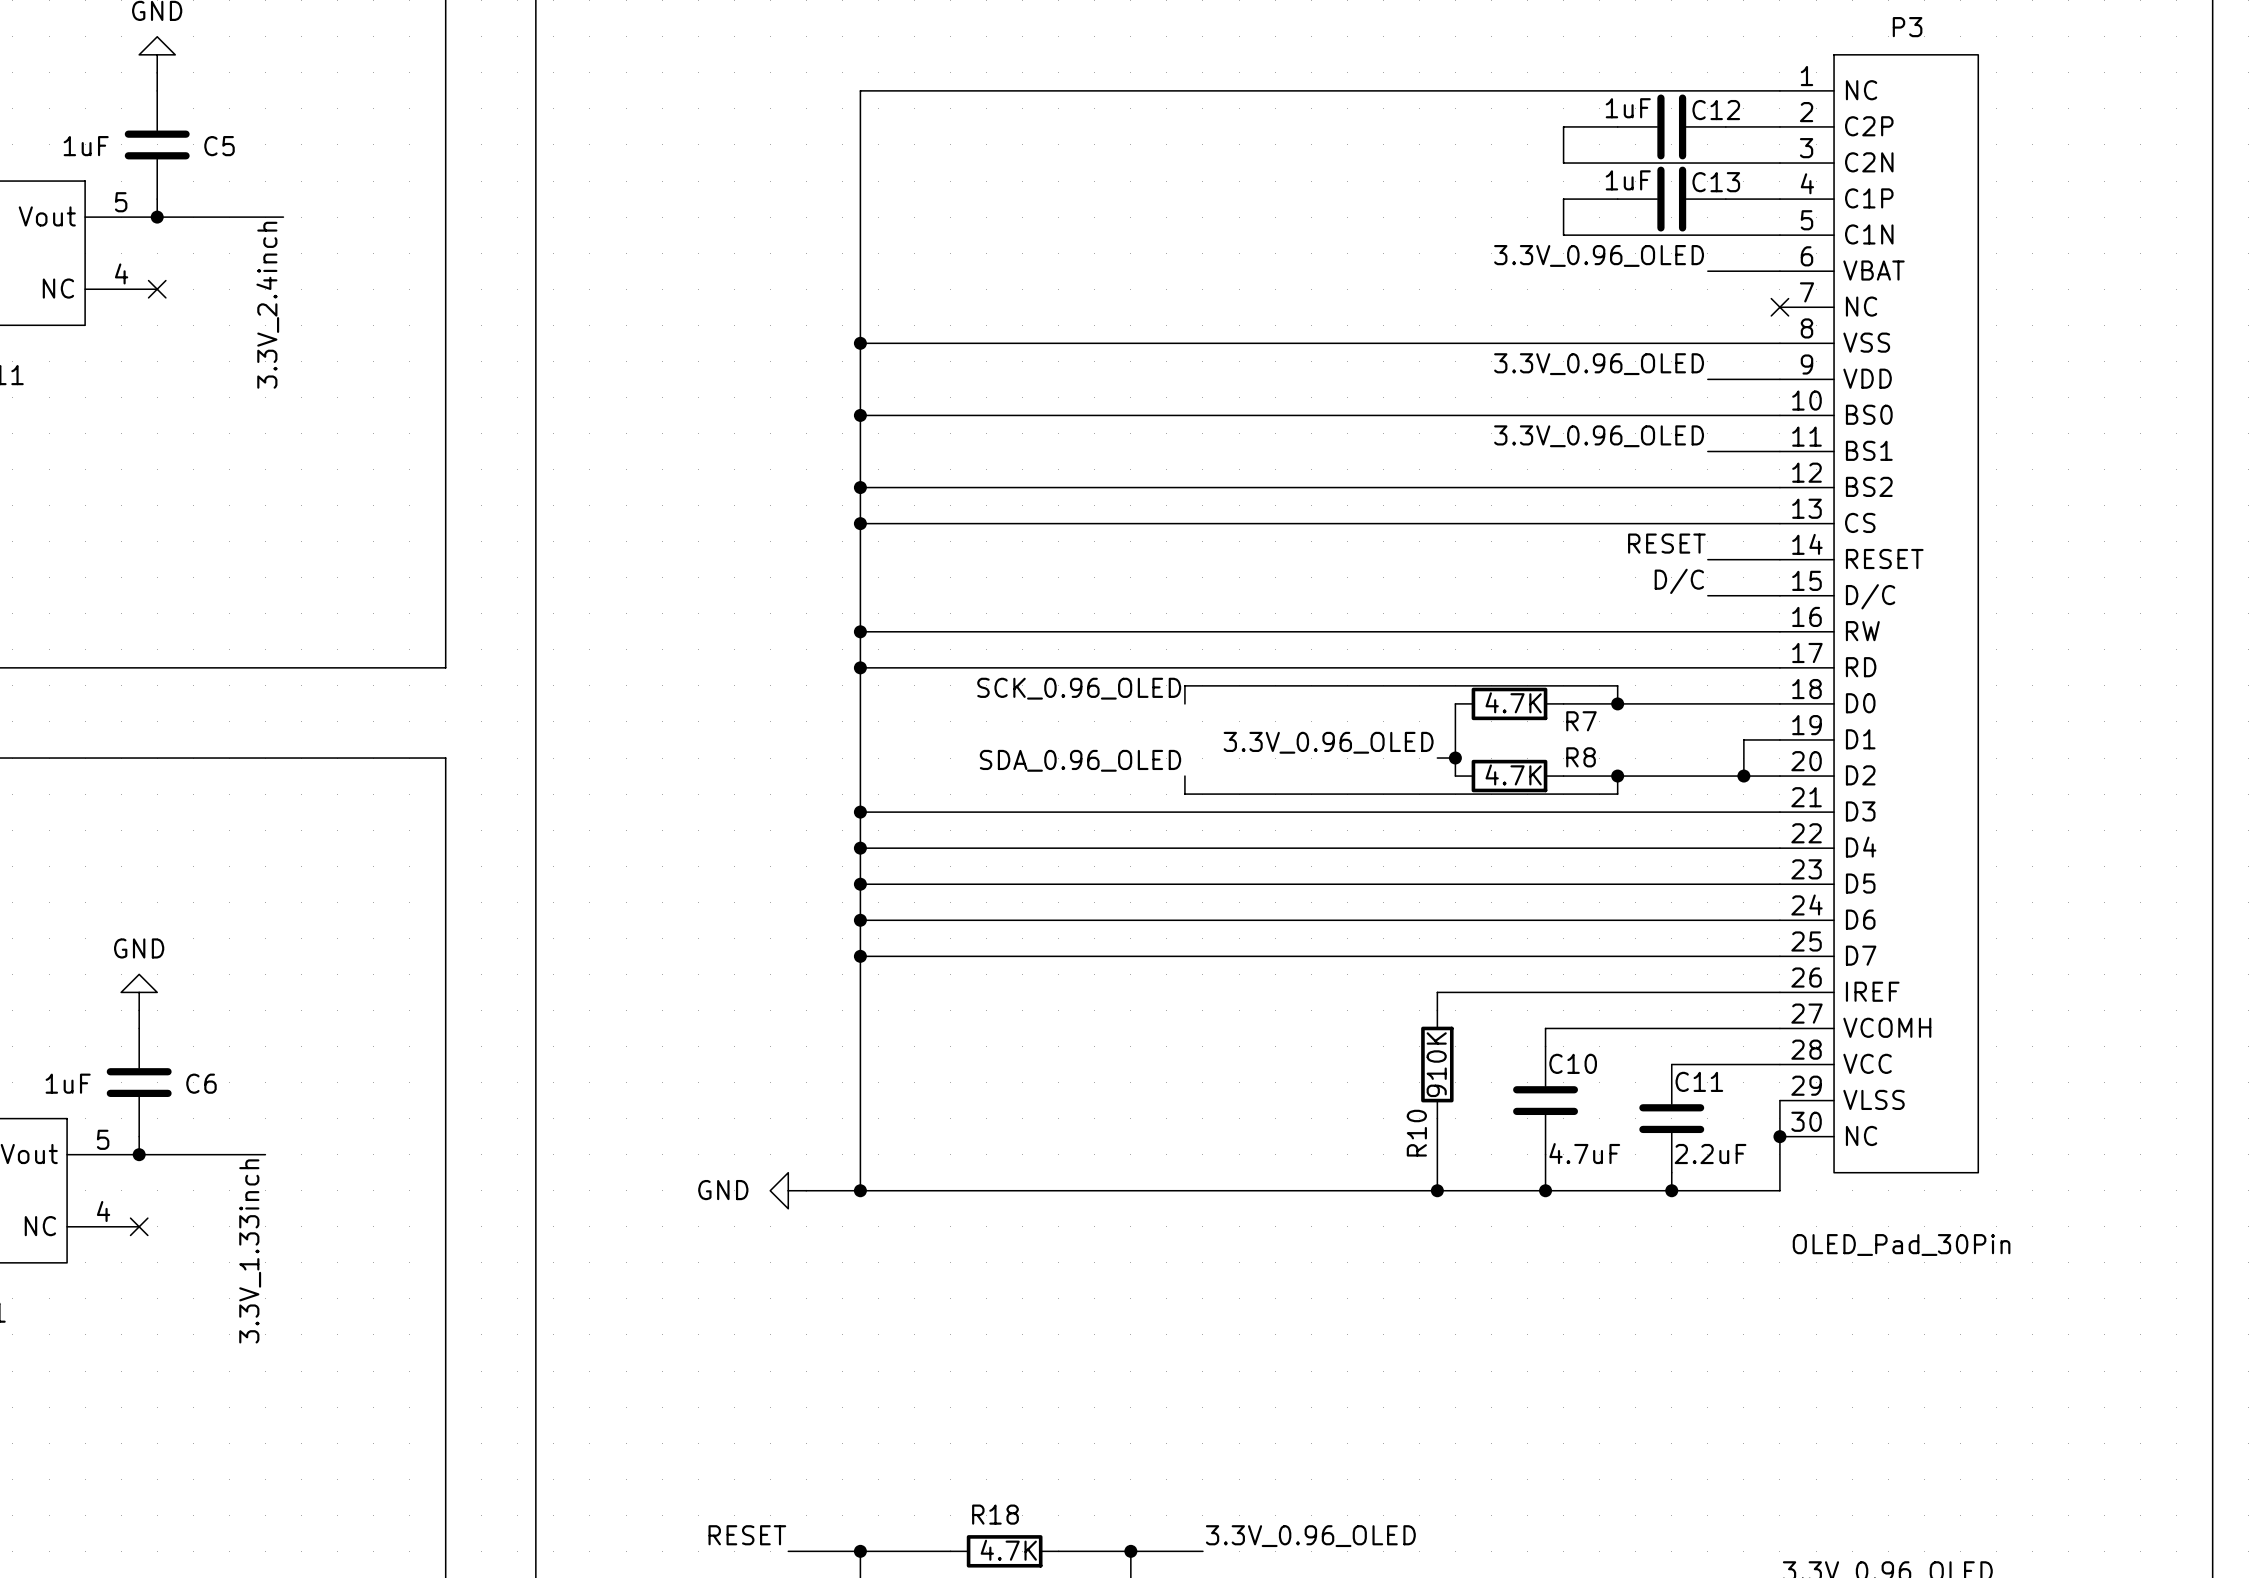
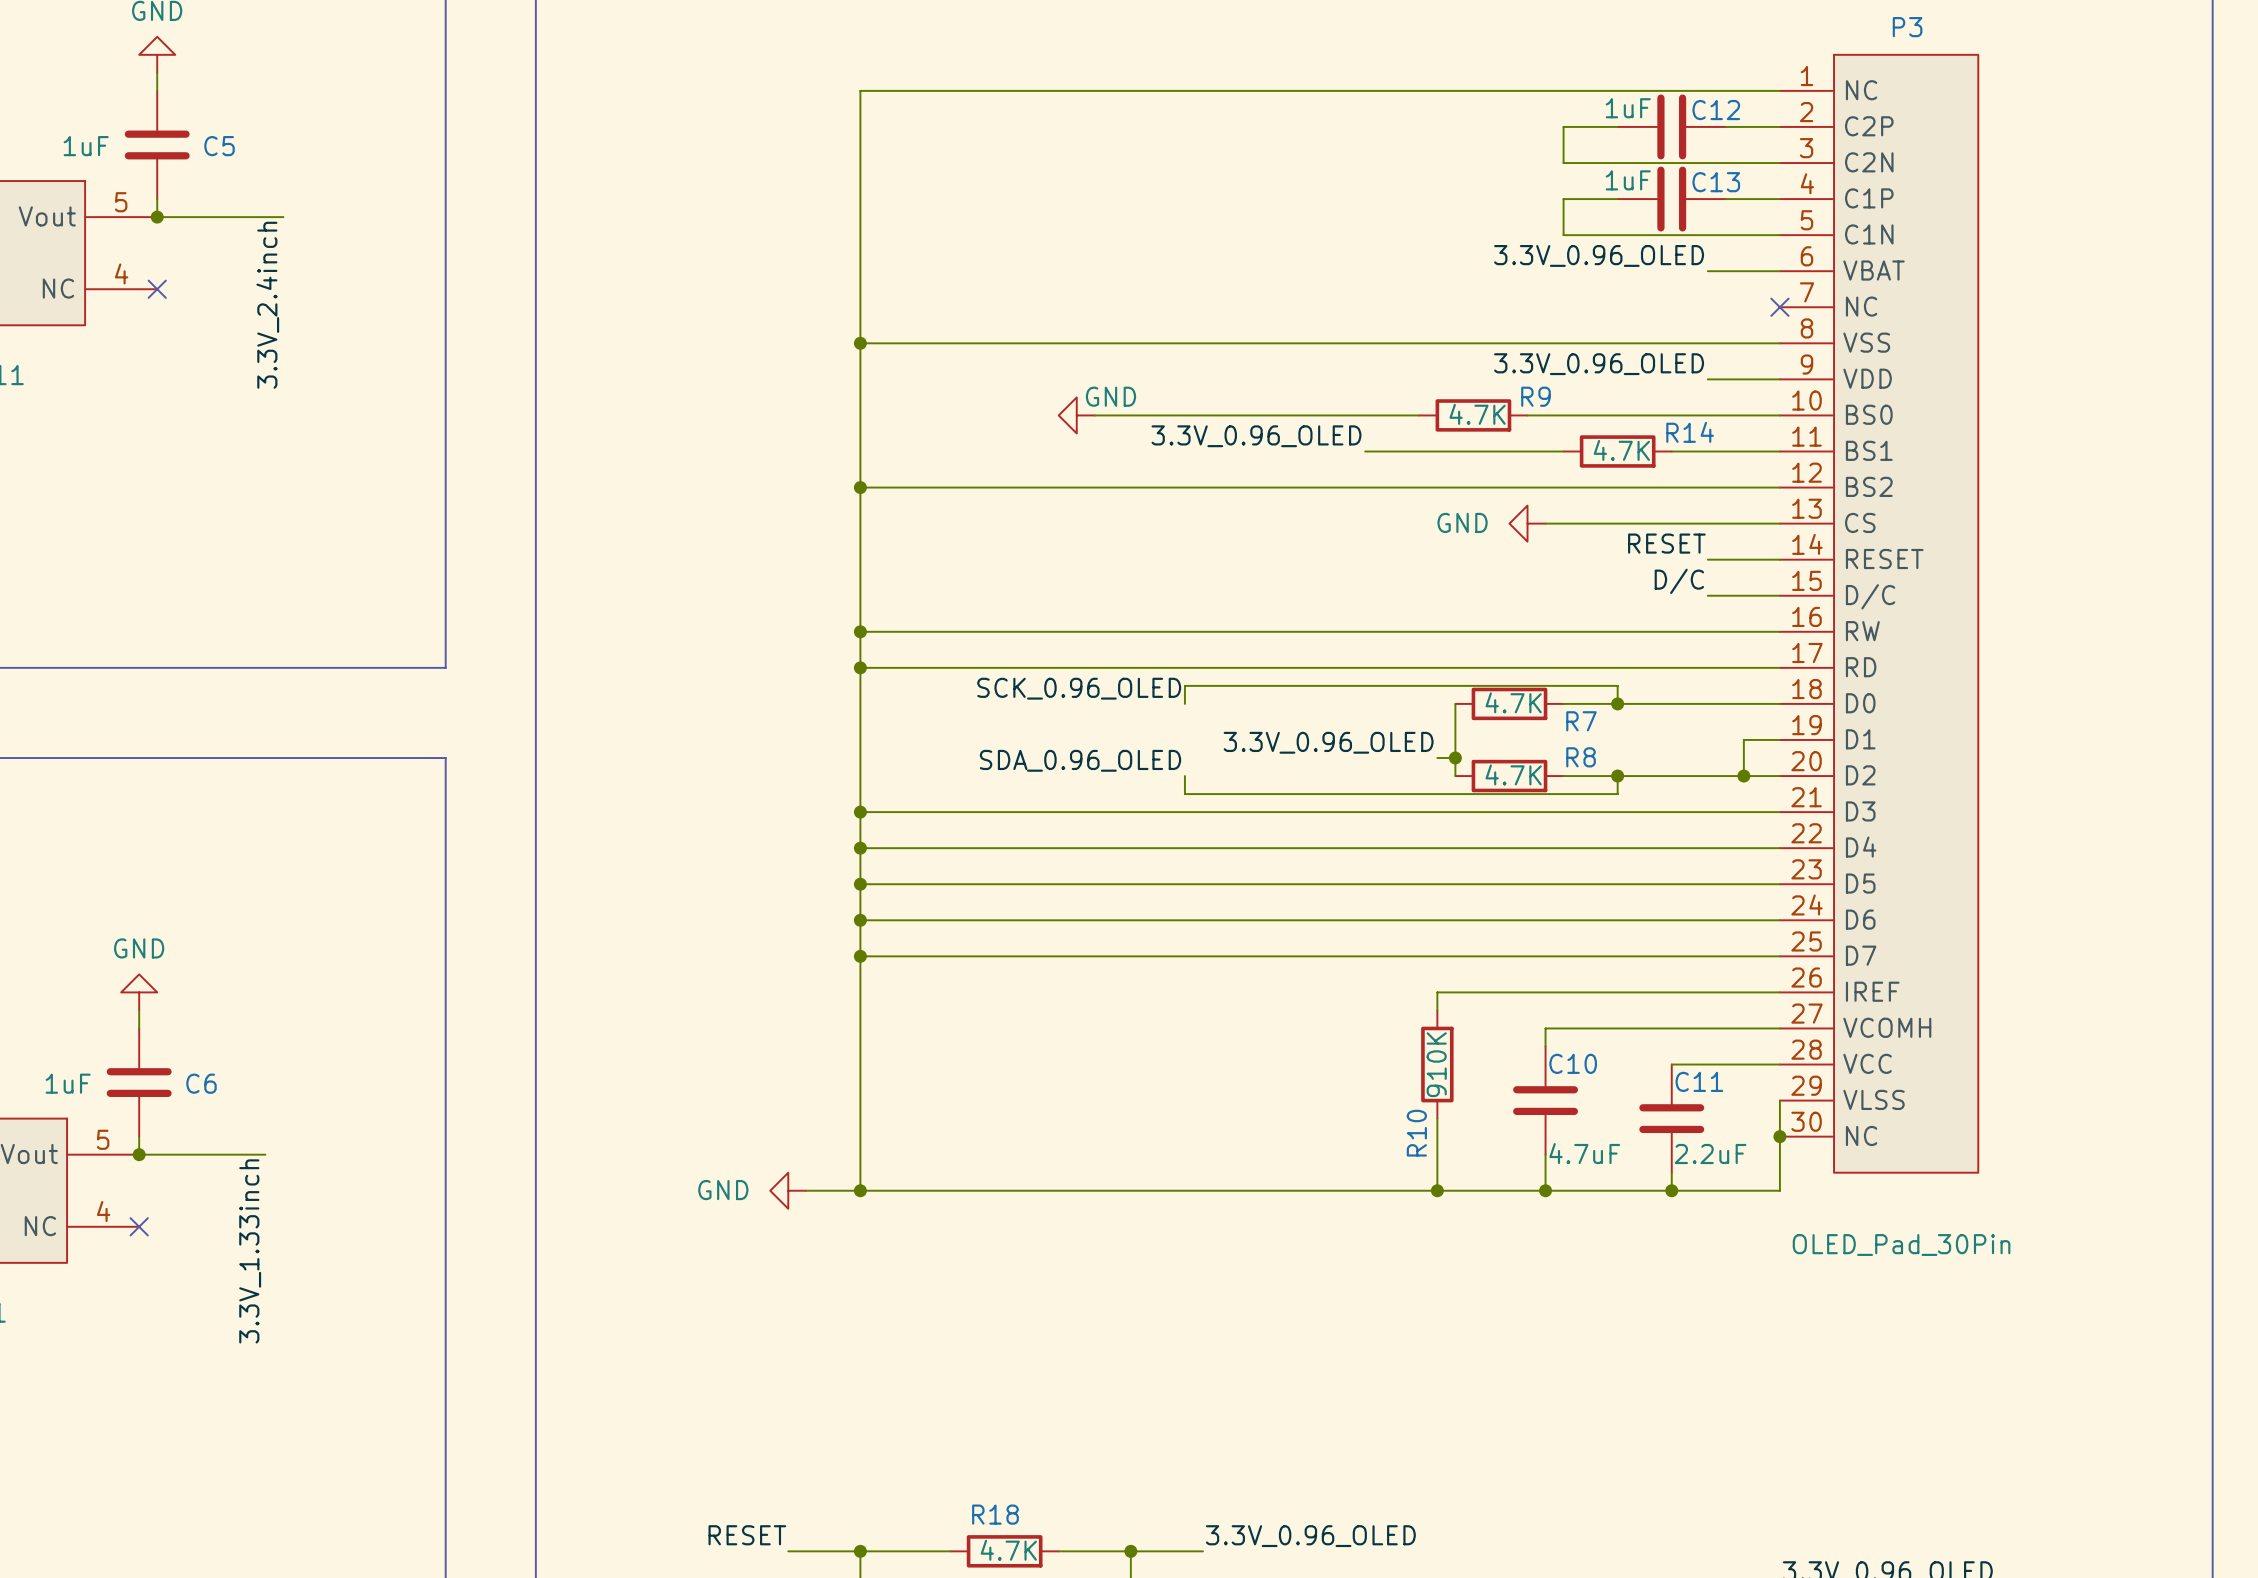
wire: (860, 415) (1094, 415) -> none
junction: (860, 415) -> none
power symbol: none -> GND (1076, 415)
wire: (1419, 415) (1527, 415) -> none
R9: none -> 4.7K (1473, 415)
label position: 3.3V_0.96_OLED (1599, 436) -> 3.3V_0.96_OLED (1256, 436)
wire: none -> (1365, 451) (1563, 451)
R14: none -> 4.7K (1617, 451)
wire: none -> (1671, 451) (1707, 451)
wire: (860, 523) (1545, 523) -> none
junction: (860, 523) -> none
power symbol: none -> GND (1527, 523)

